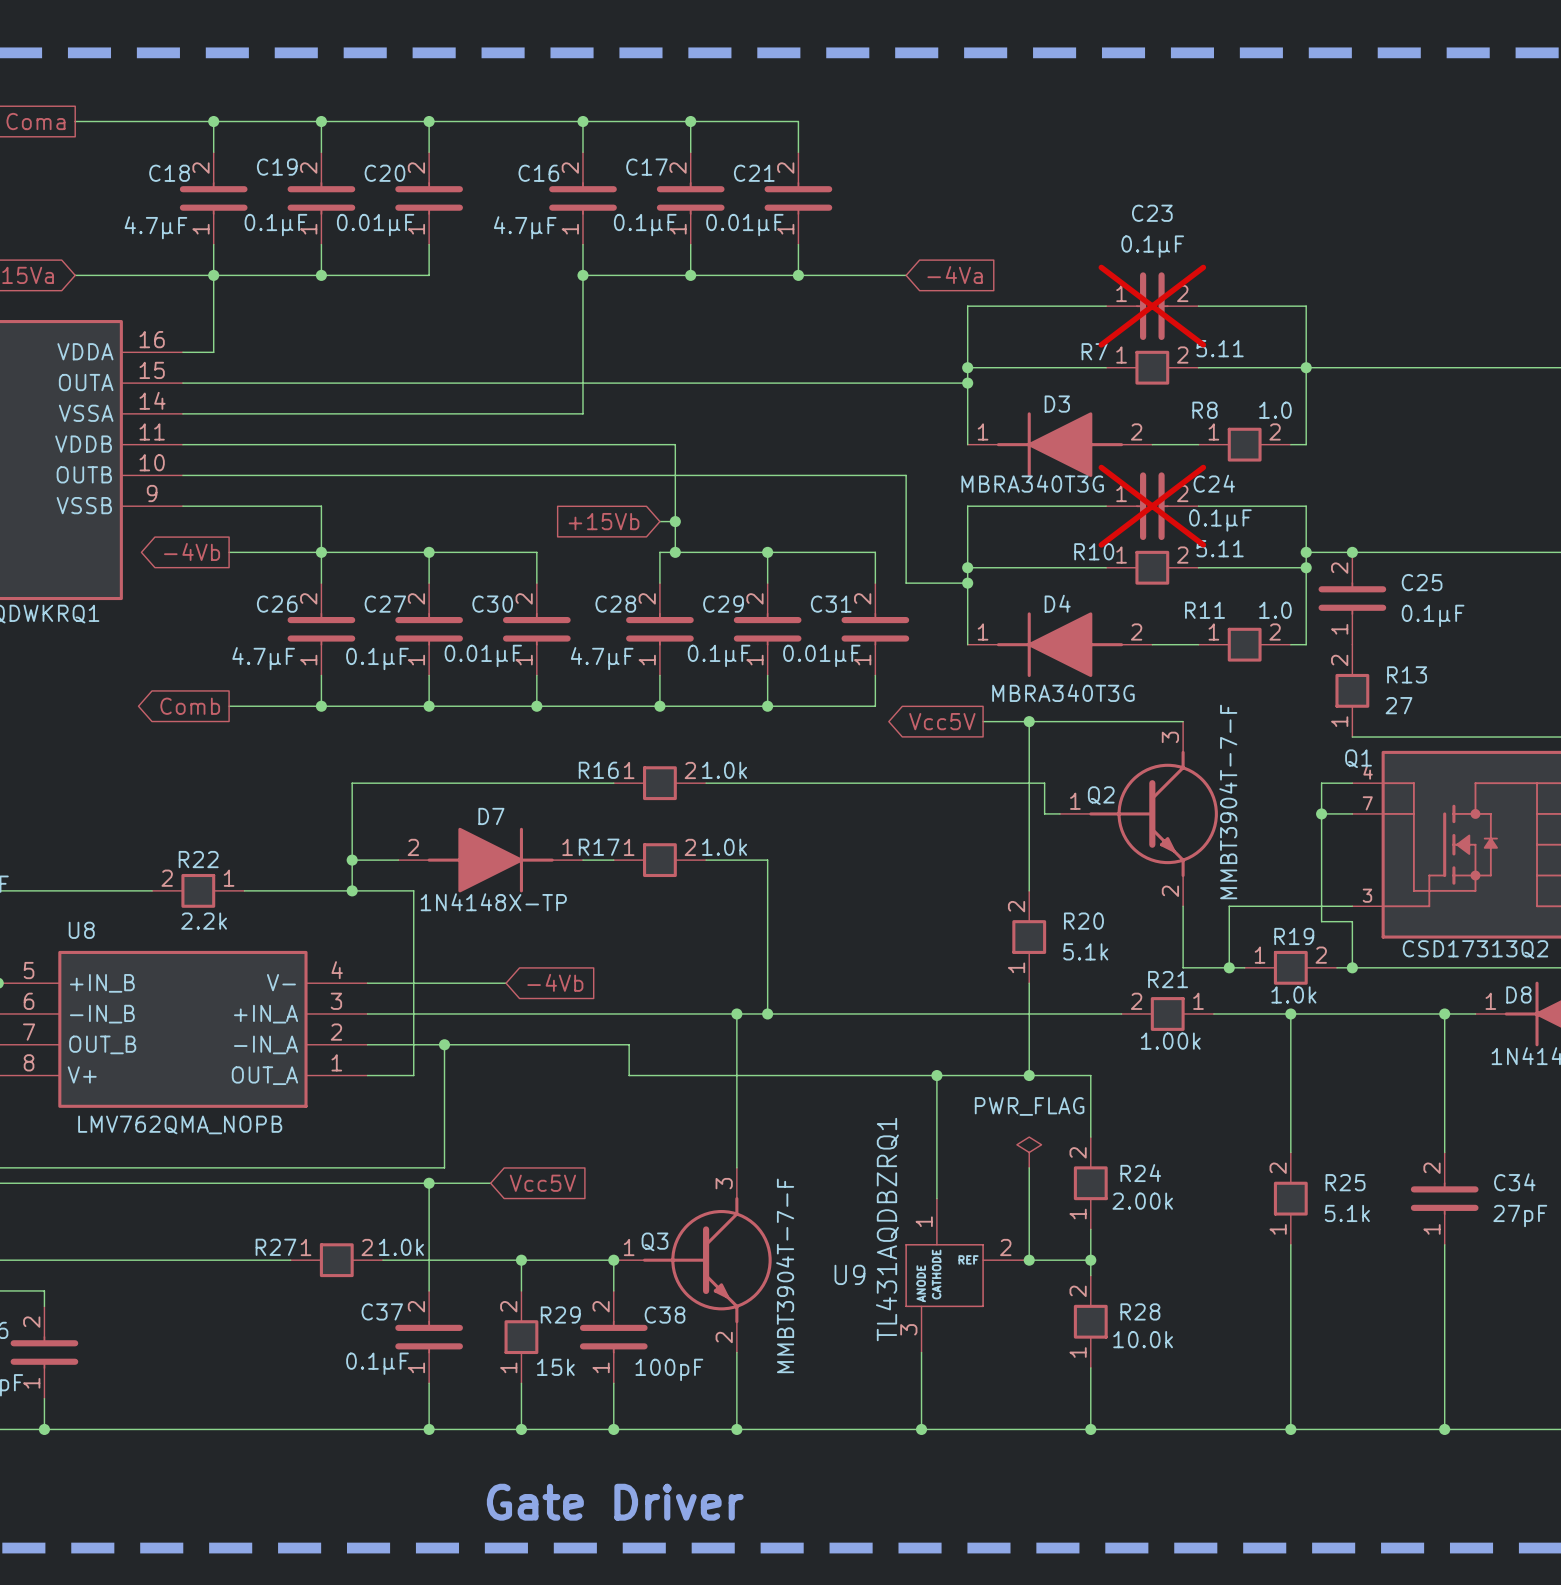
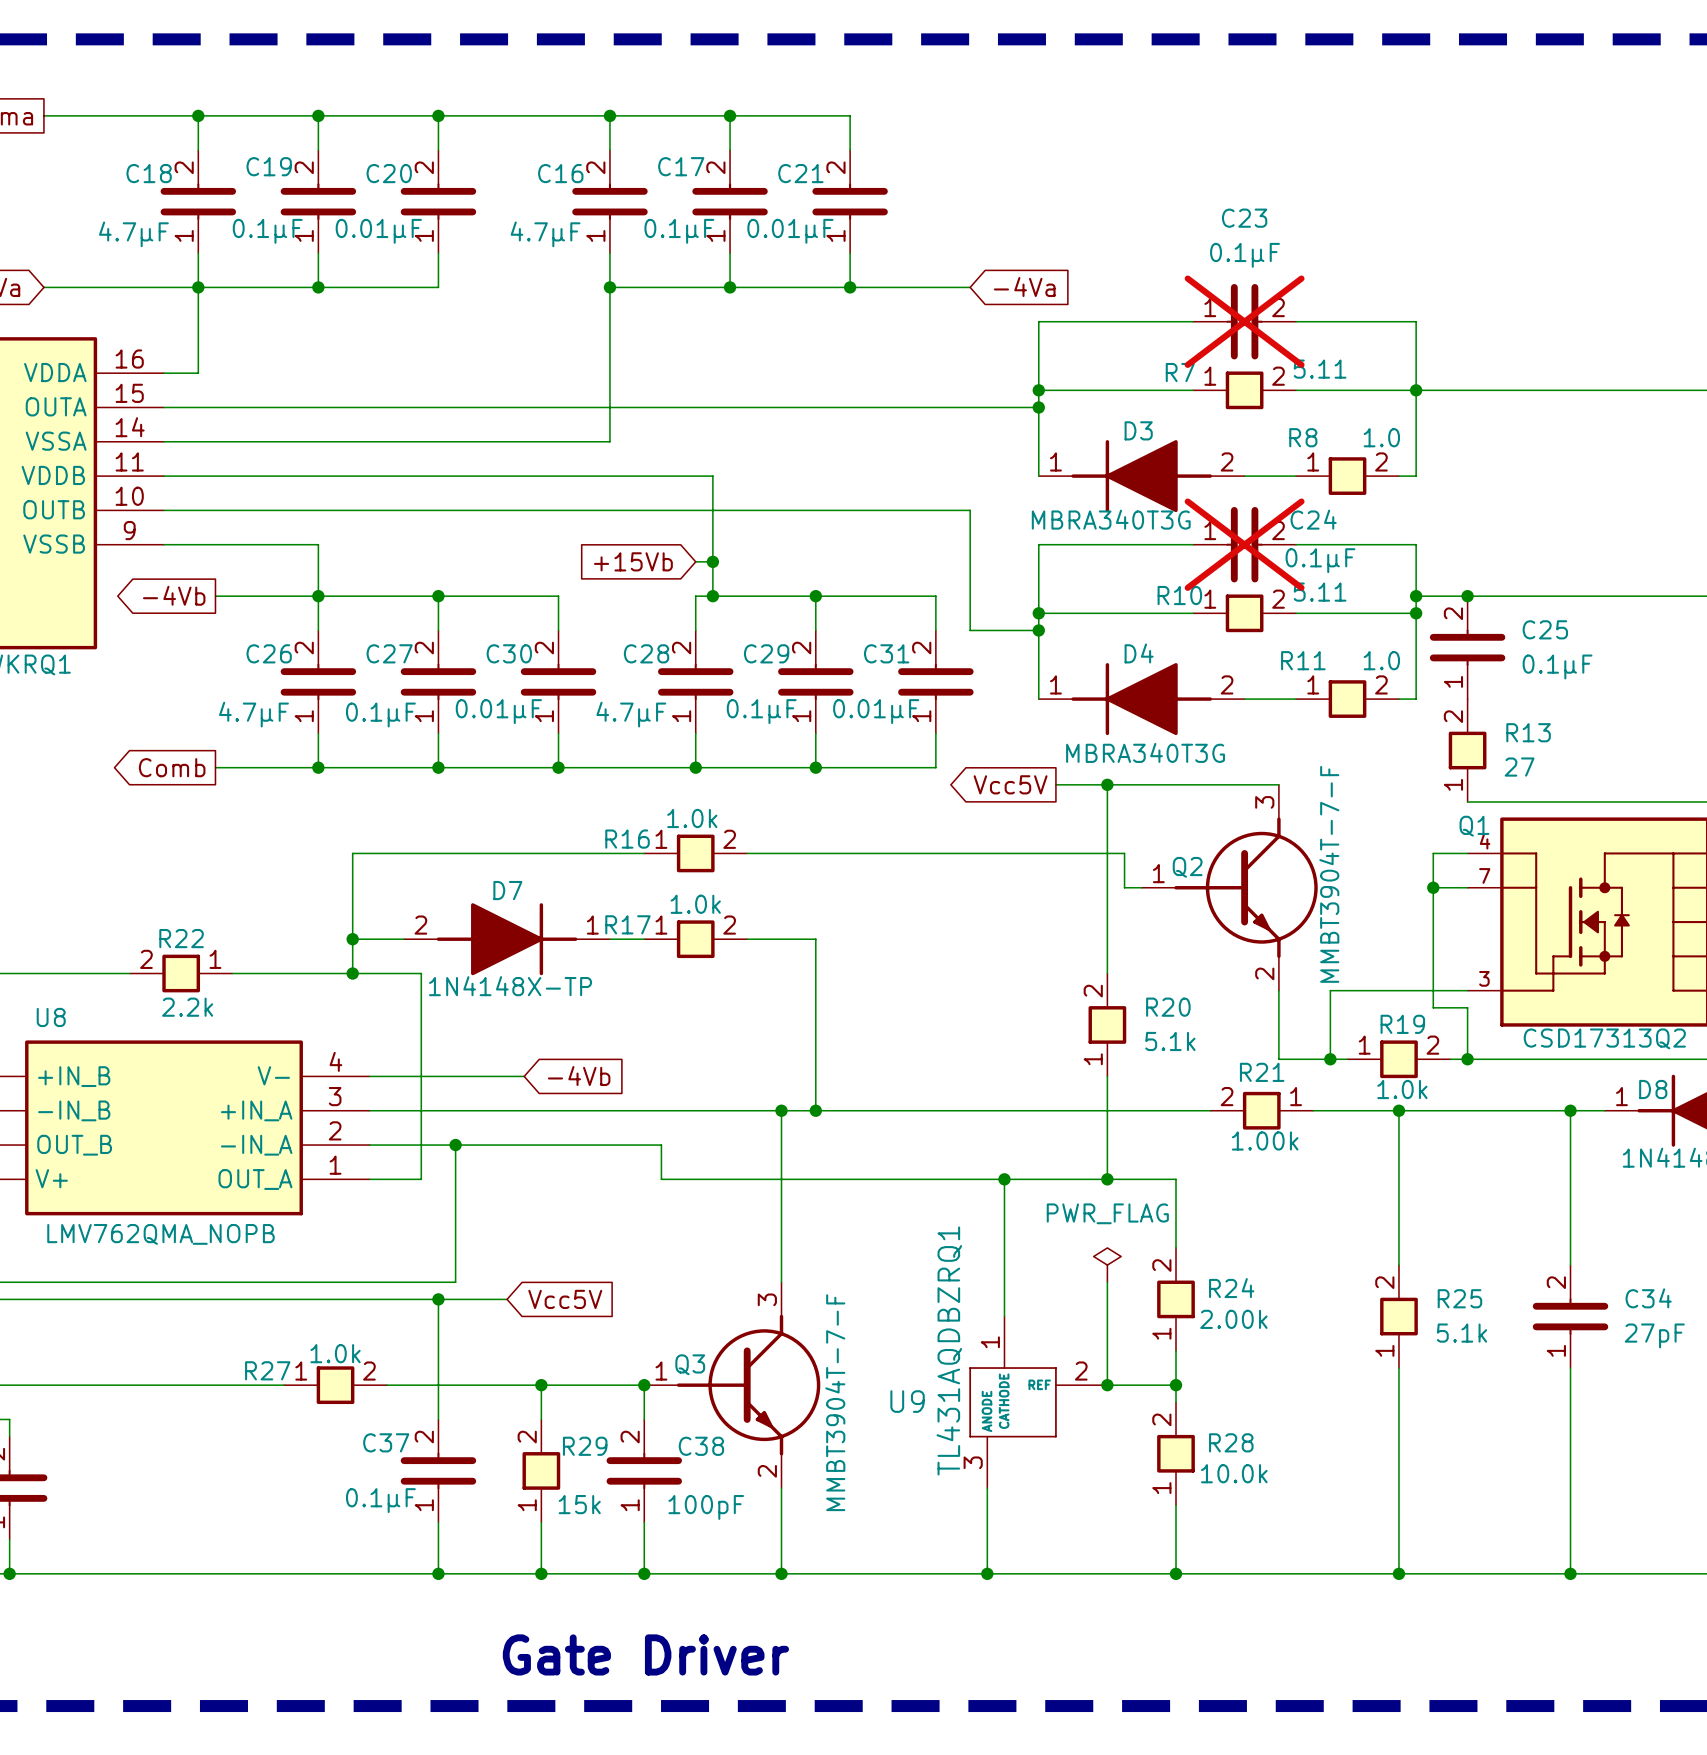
R16 value position: 1.0k (724, 770) -> 1.0k (692, 818)
R17 value position: 1.0k (724, 847) -> 1.0k (695, 904)
R27 value position: 1.0k (401, 1247) -> 1.0k (335, 1353)

